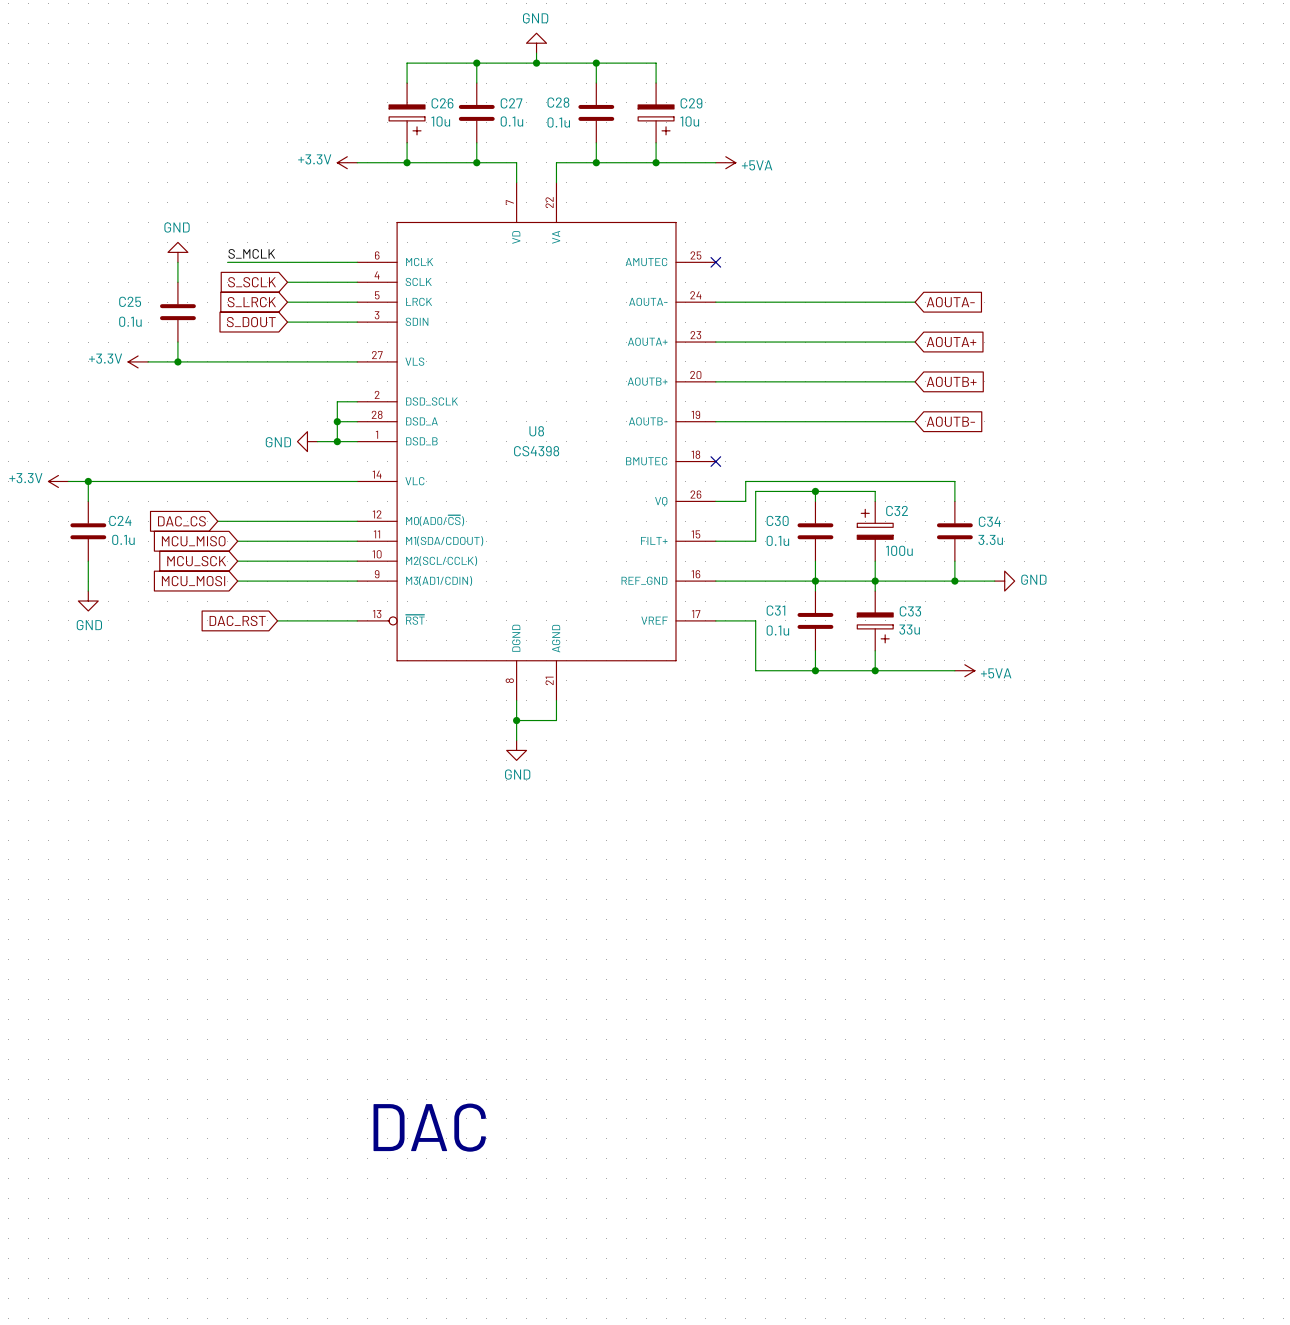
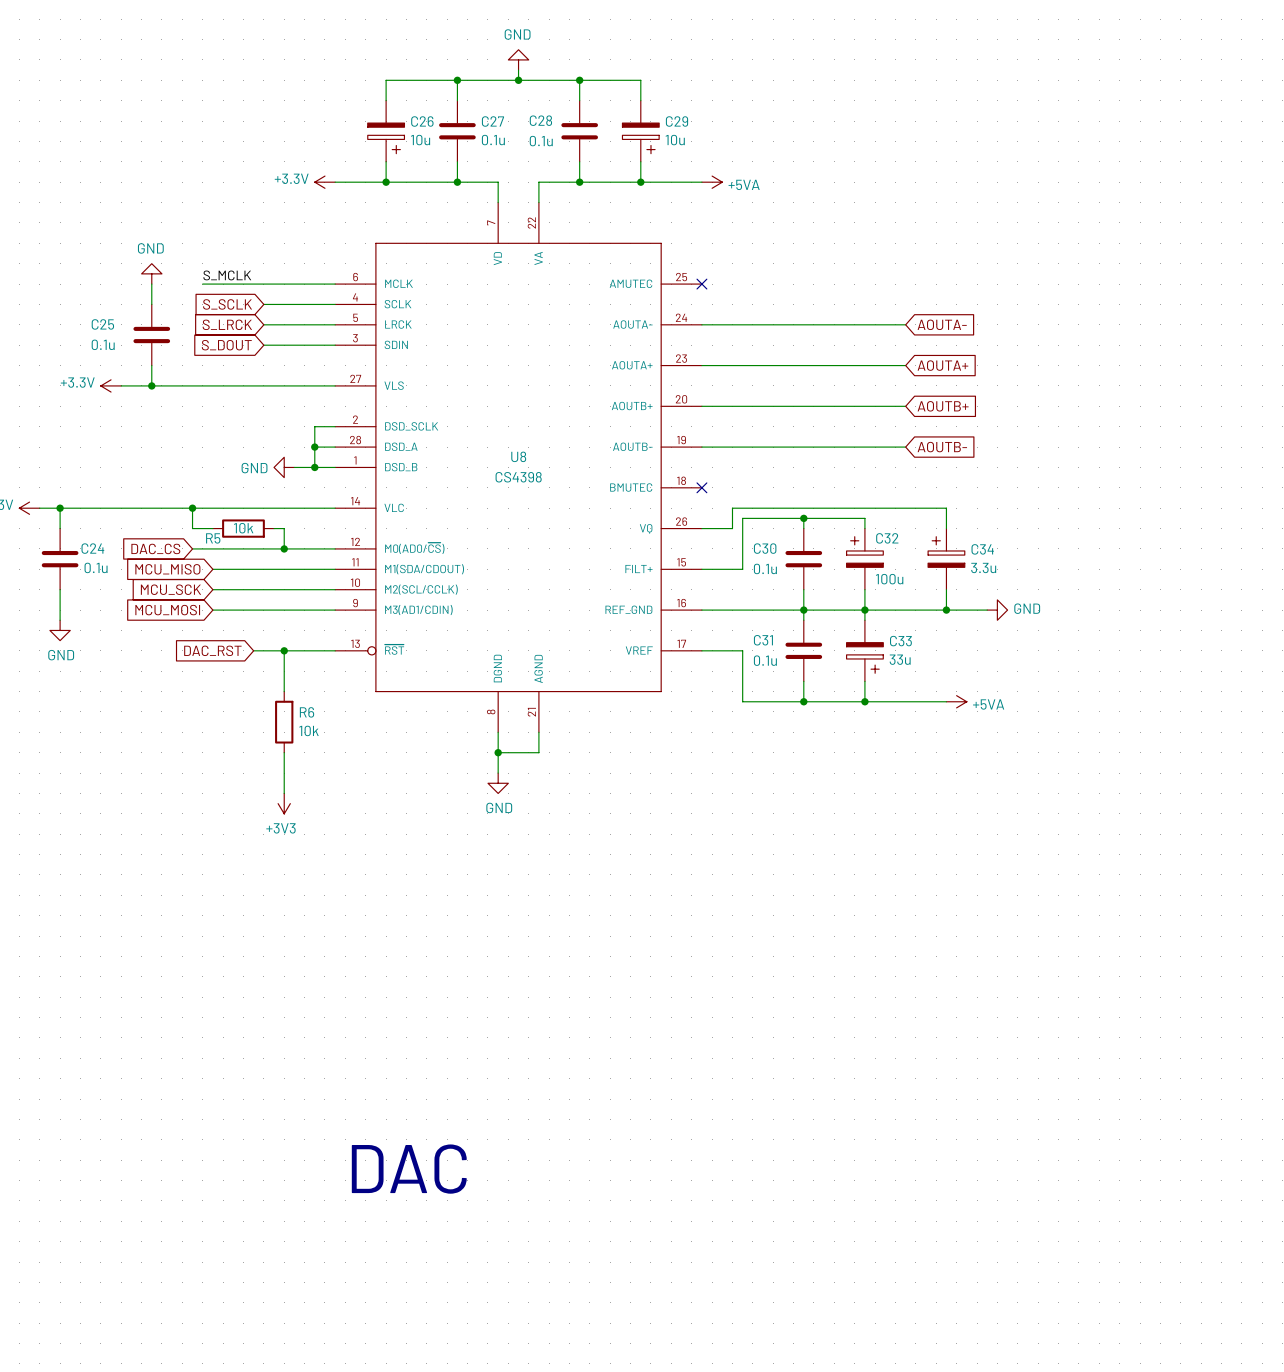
wire: none -> (192, 508) (192, 528) (212, 528)
junction: none -> (192, 508)
R5: none -> 10k (243, 528)
wire: none -> (274, 528) (284, 528) (284, 548)
C34 symbol: [936, 501, 973, 562] -> [928, 528, 965, 590]
junction: none -> (284, 548)
wire: none -> (284, 650) (284, 691)
junction: none -> (284, 650)
R6: none -> 10k (284, 722)
wire: none -> (284, 752) (284, 793)
power symbol: none -> +3V3 (284, 803)

